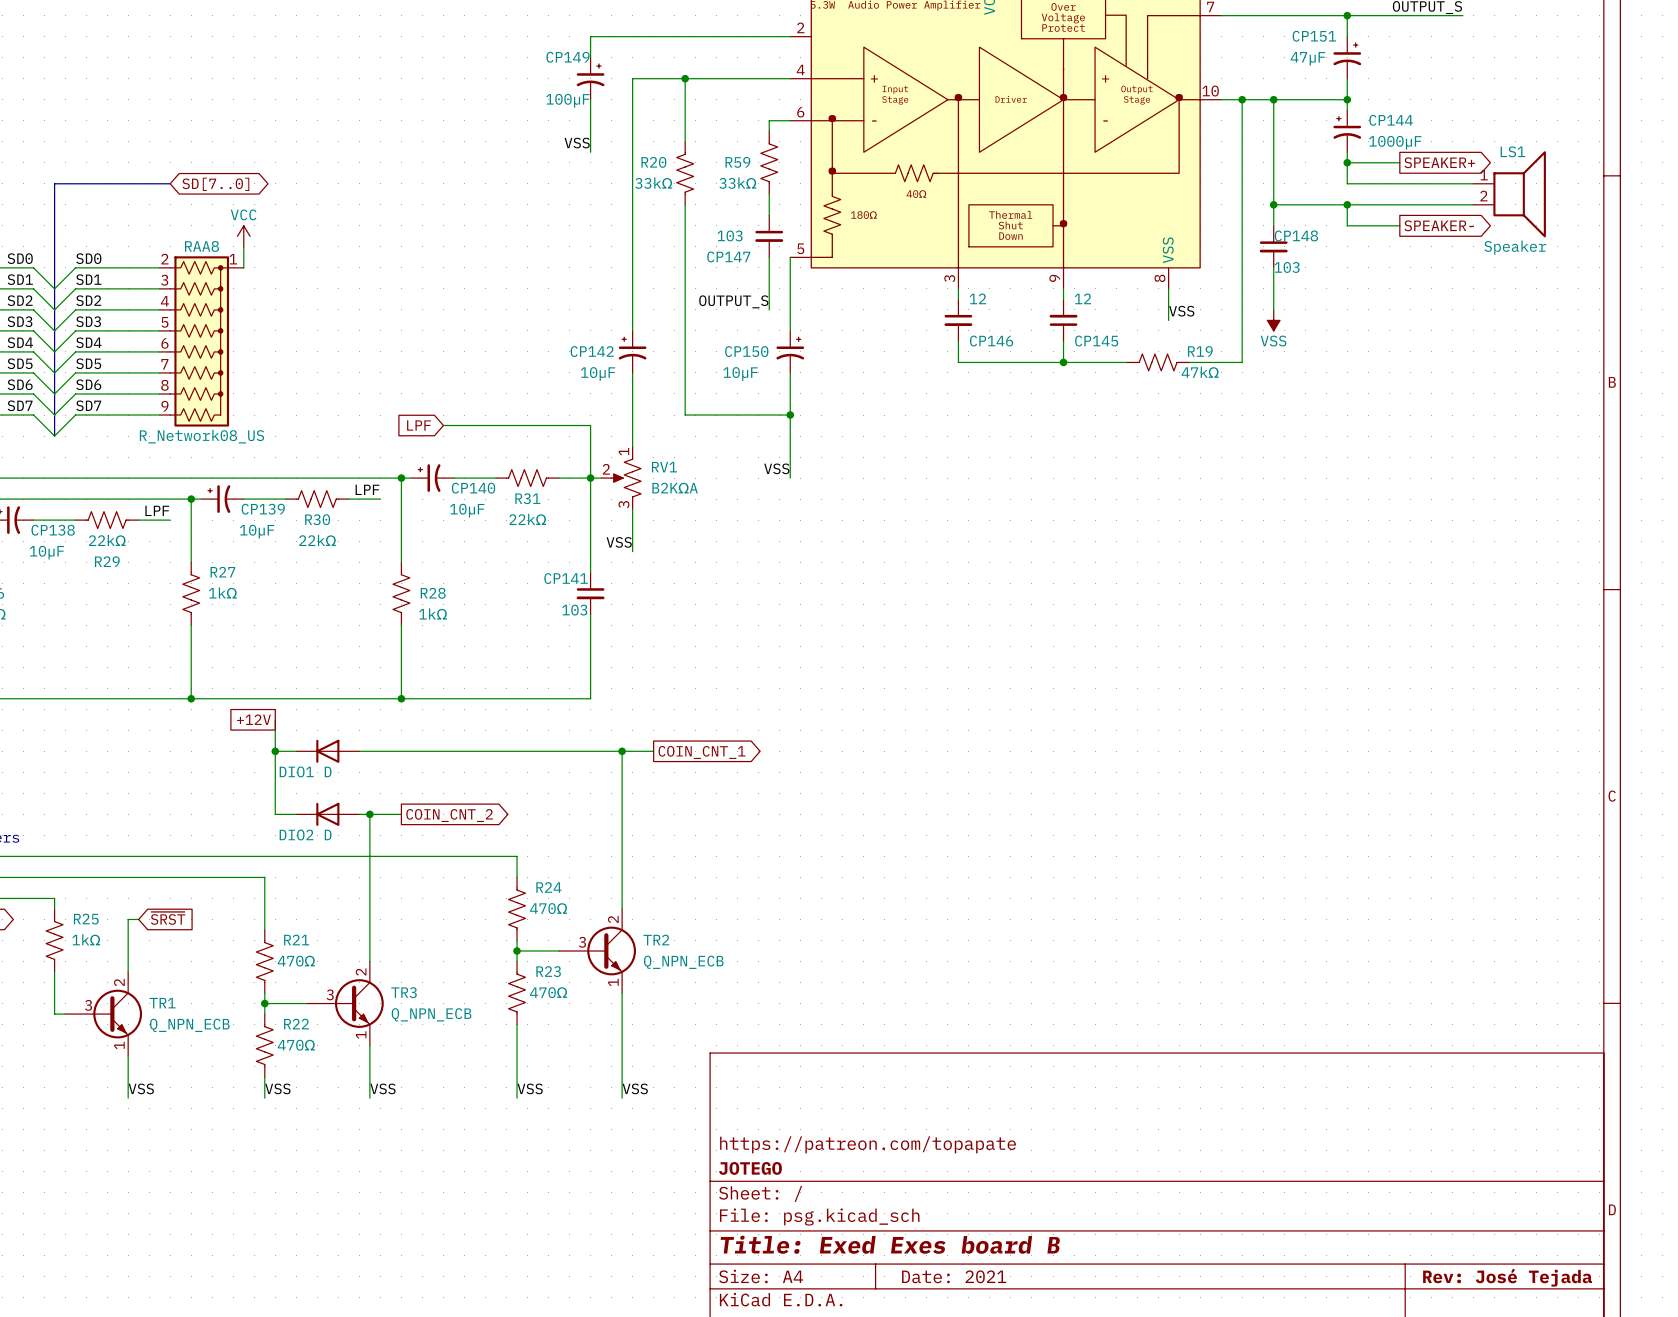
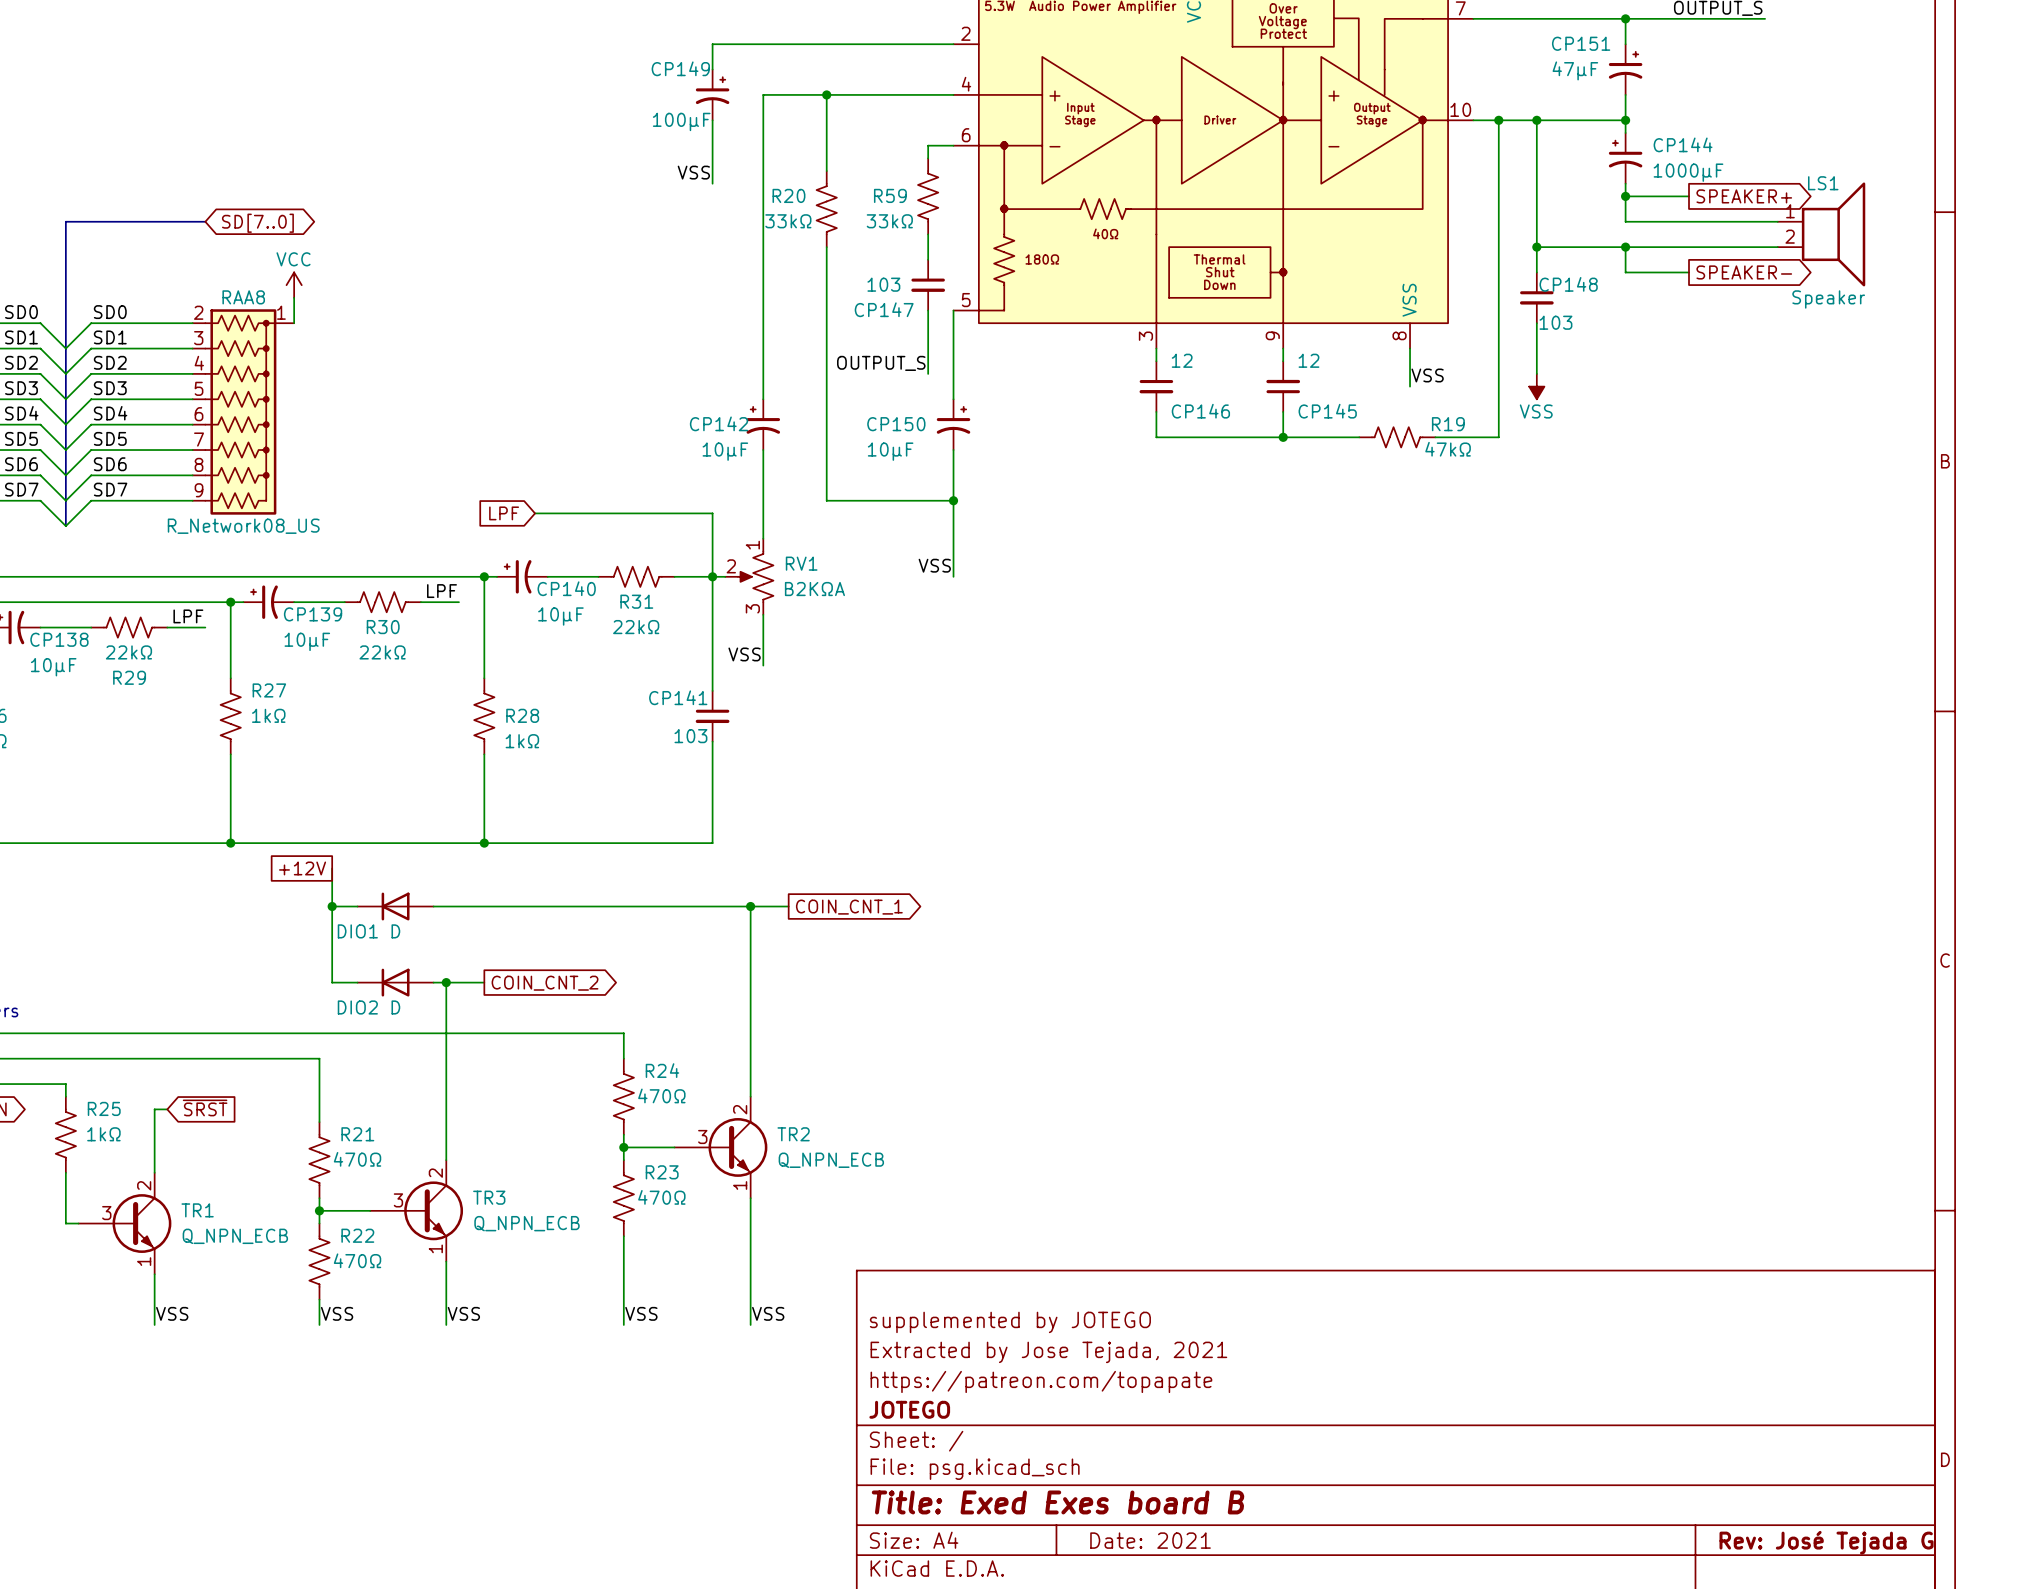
title block: none -> supplemented by JOTEGO (1010, 1322)
title block: none -> Extracted by Jose Tejada, 2021 (1048, 1352)
title block: Rev: José Tejada (1507, 1277) -> Rev: José Tejada G (1826, 1542)

